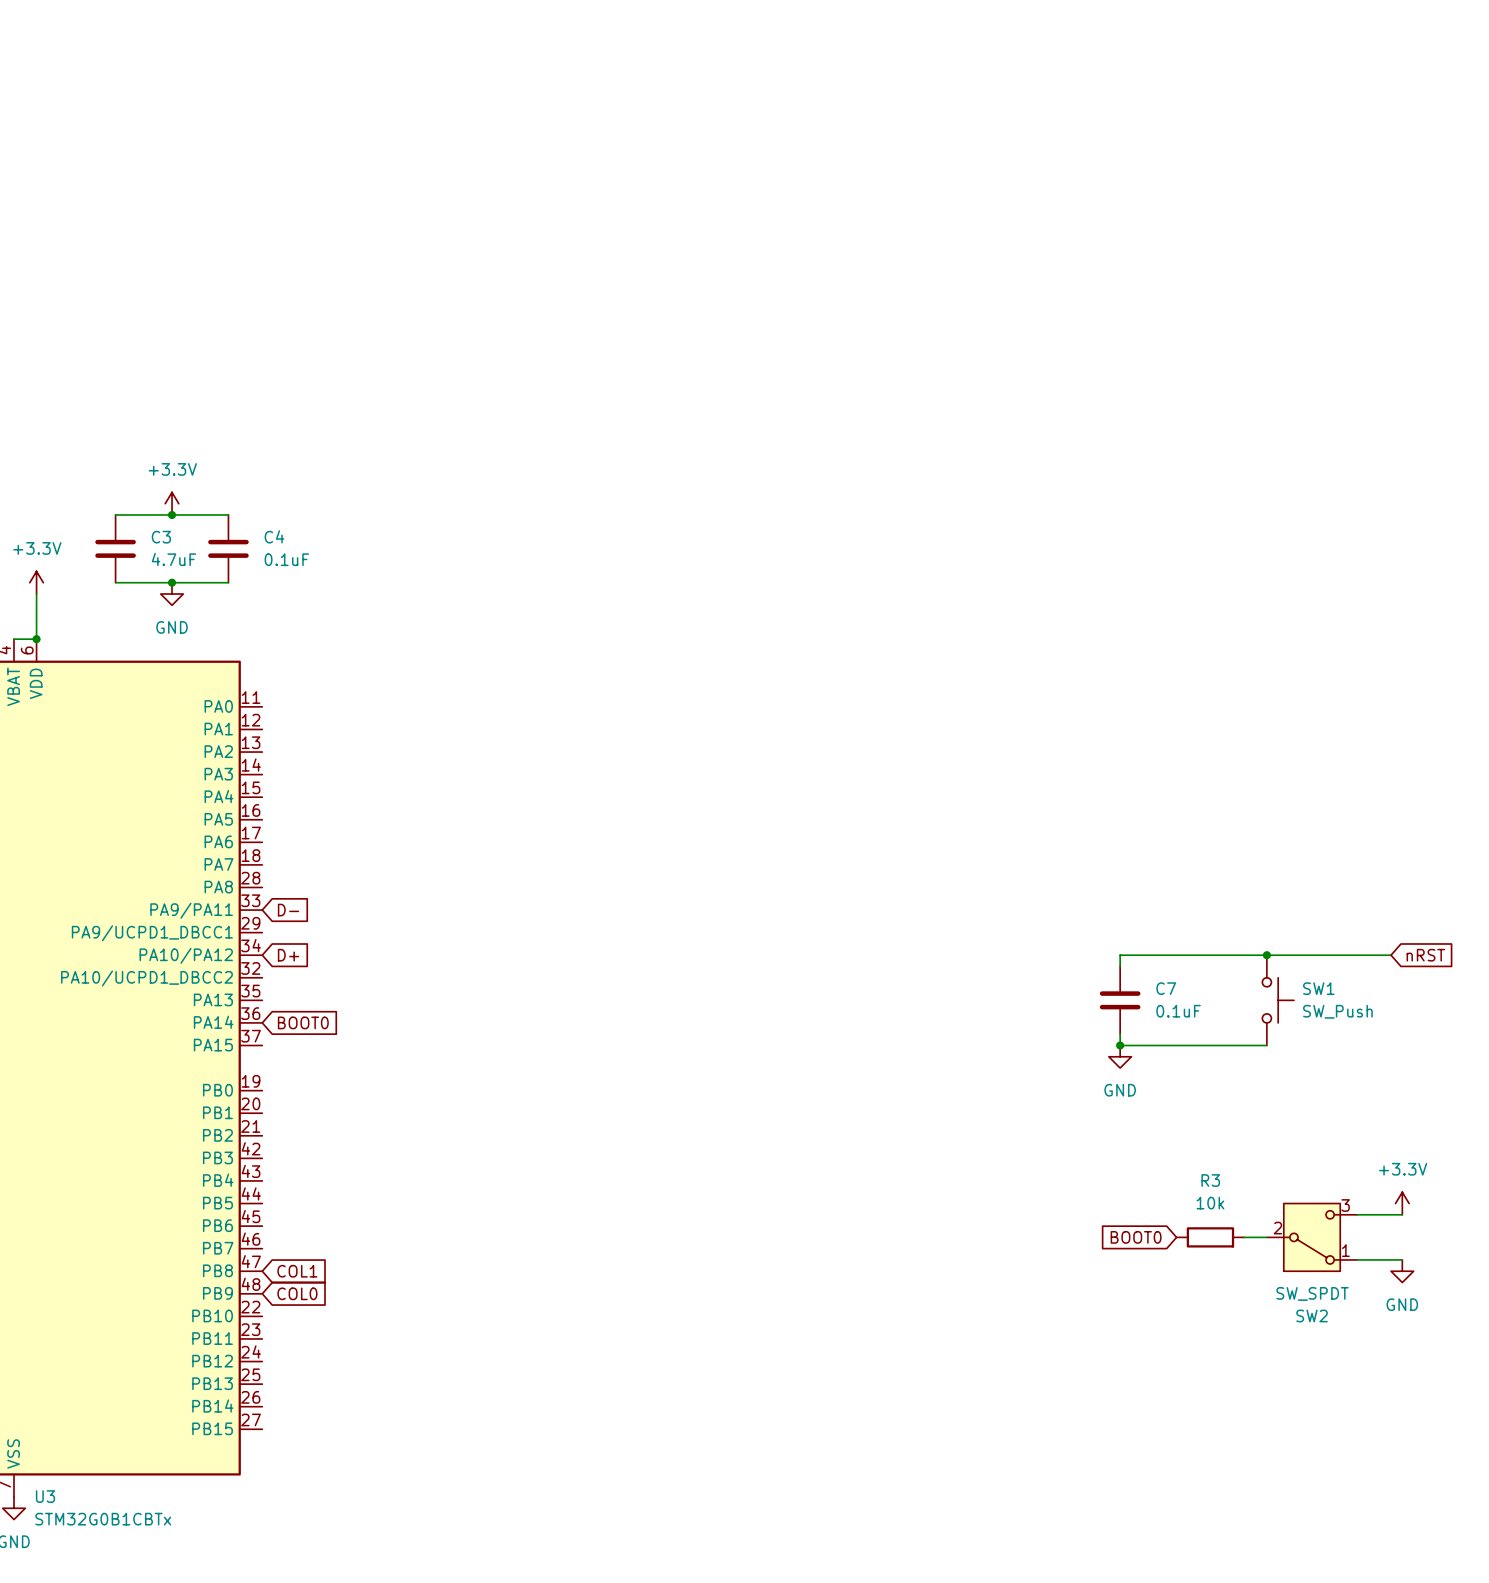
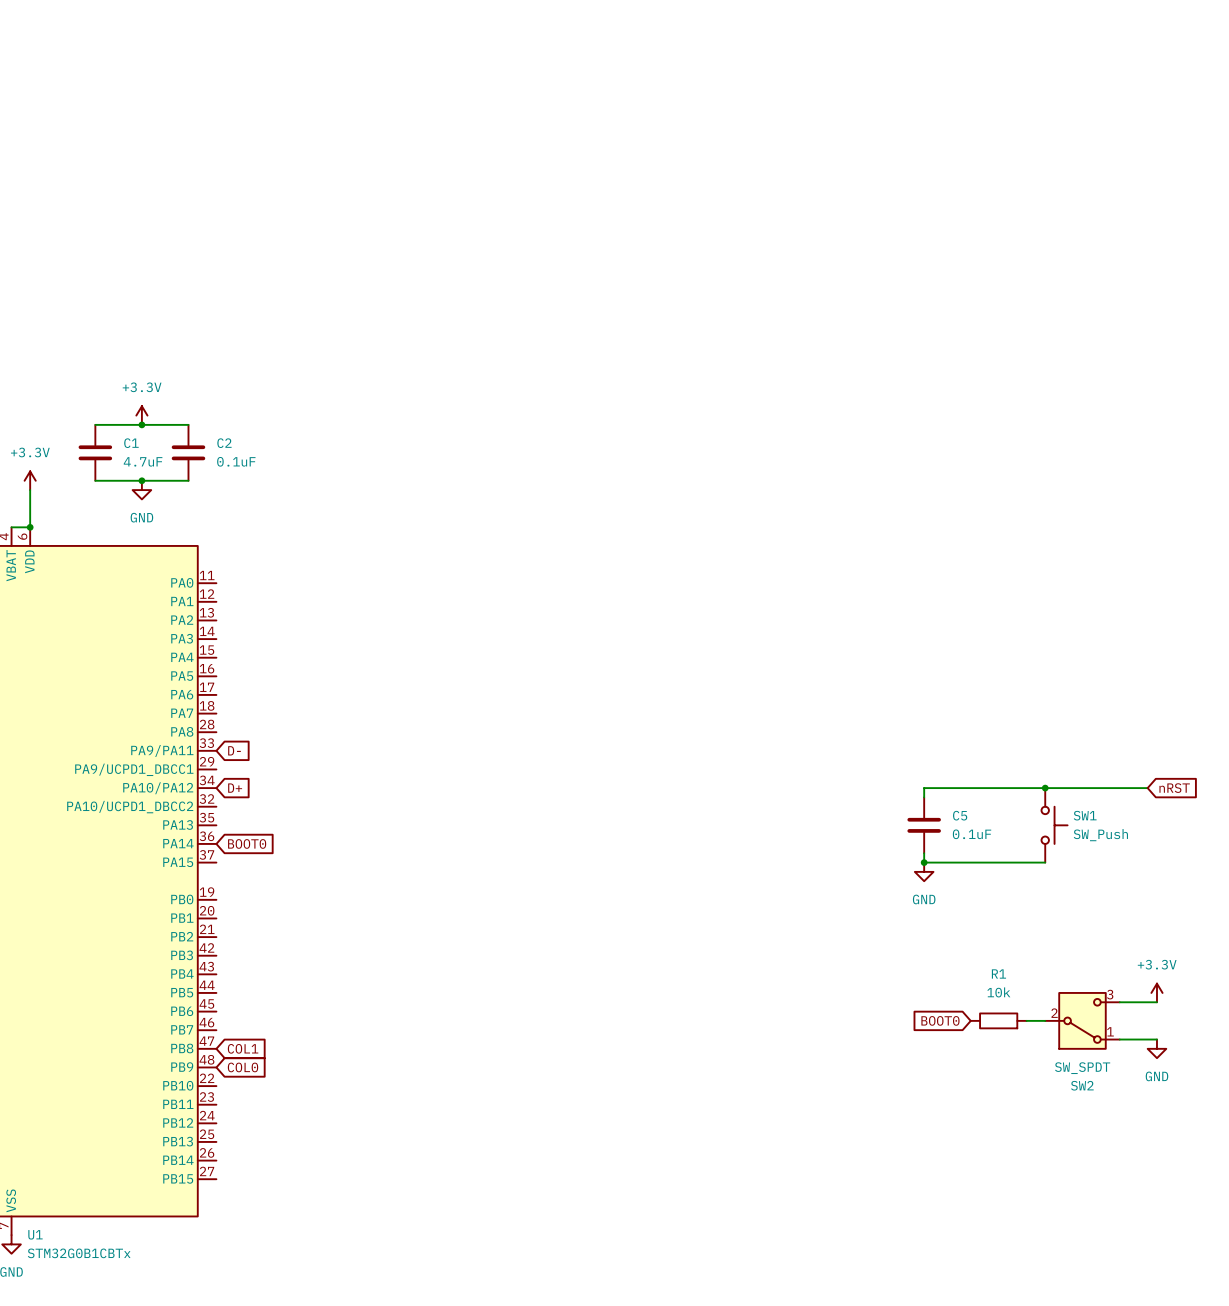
C4 name: C4 (274, 536) -> C2 (224, 443)
C3 name: C3 (161, 537) -> C1 (131, 443)
C7 name: C7 (1166, 988) -> C5 (960, 815)
R3 name: R3 (1210, 1180) -> R1 (998, 973)
U3 name: U3 (45, 1496) -> U1 (35, 1234)

